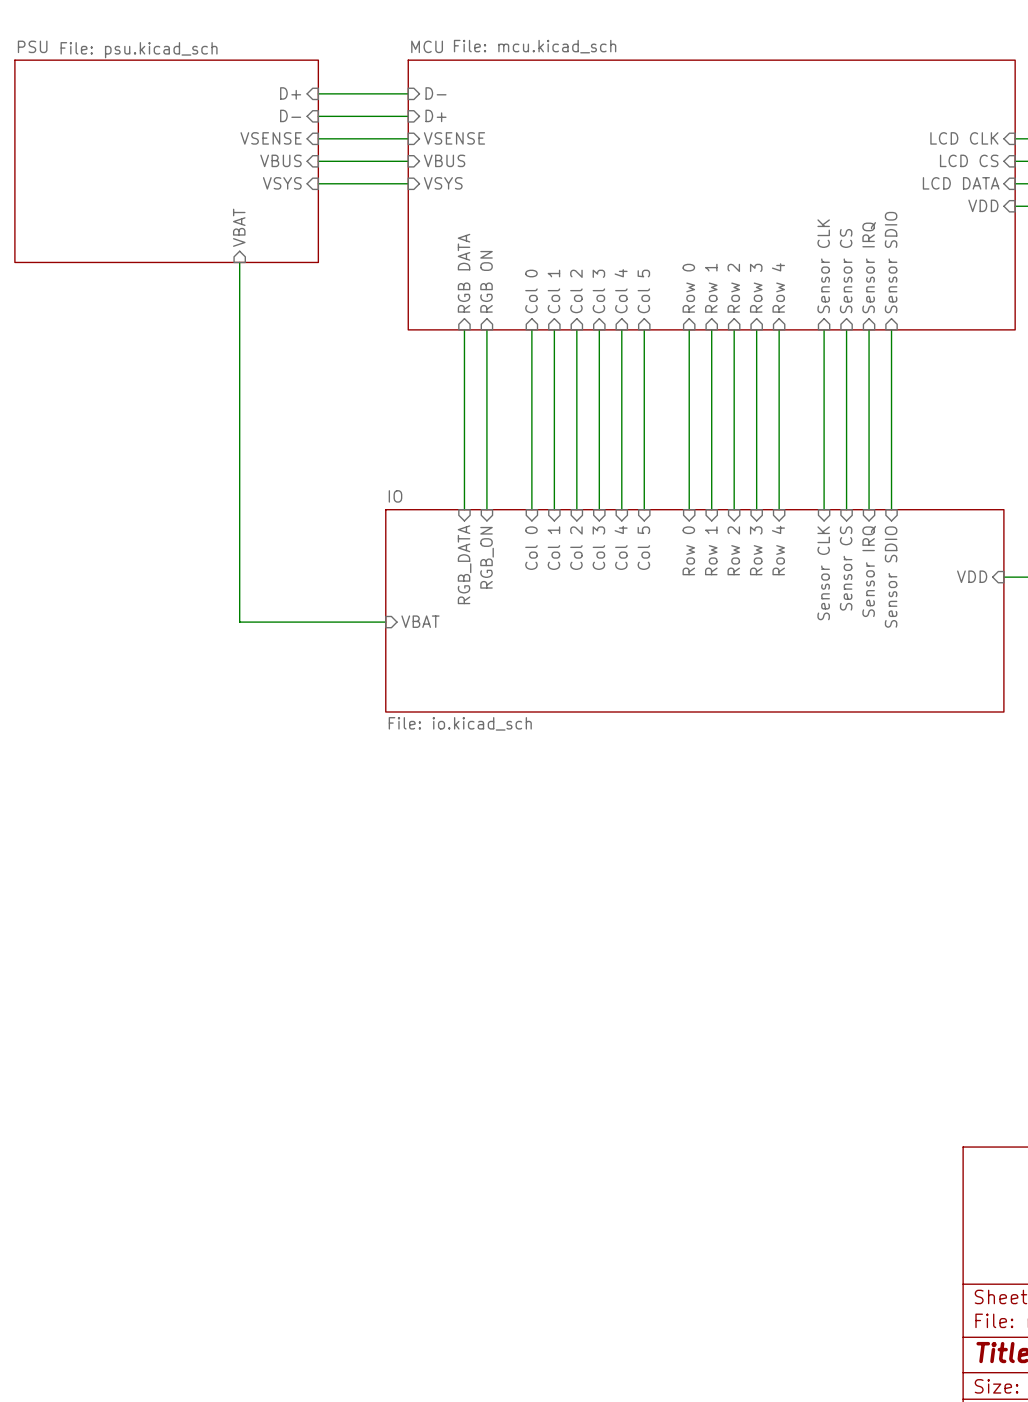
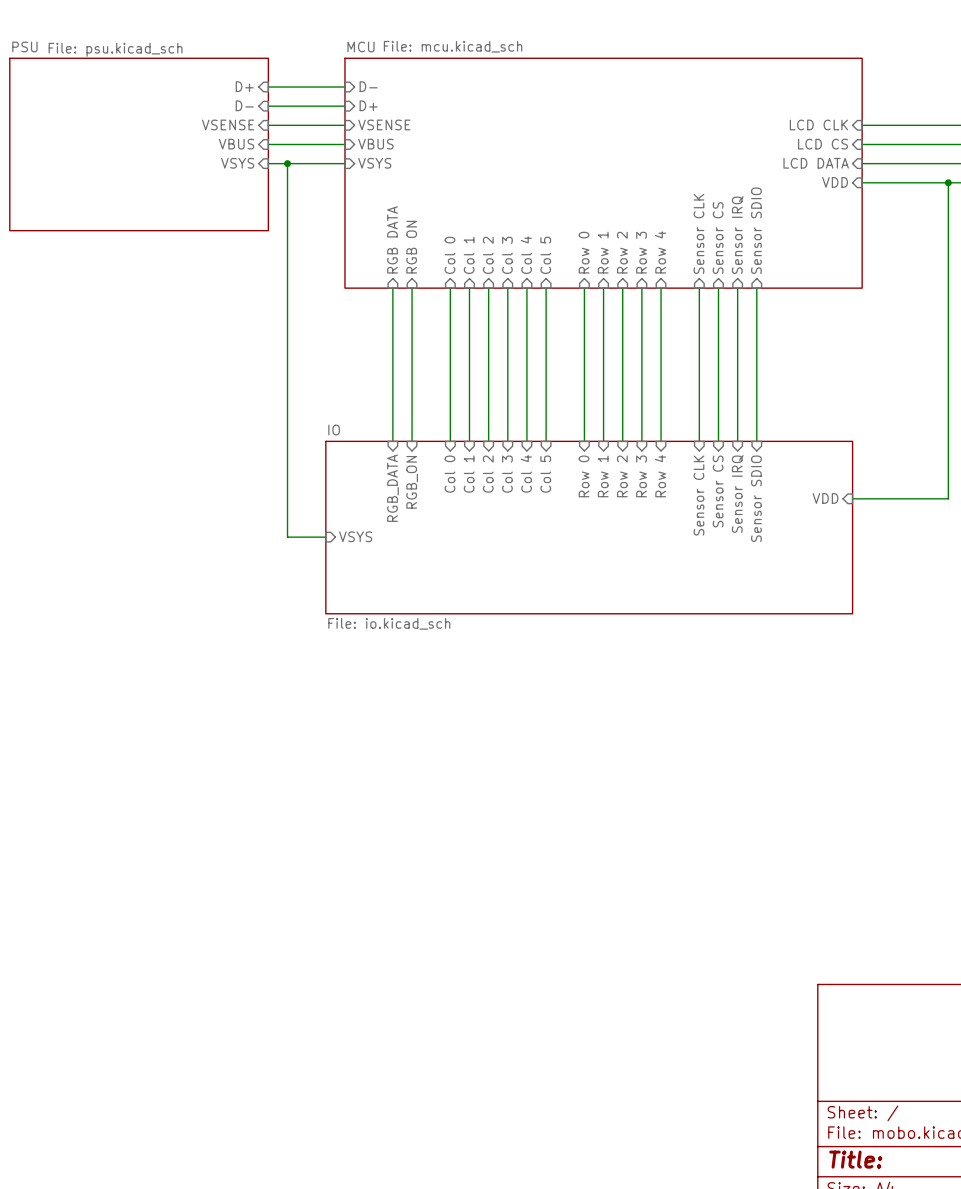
junction: none -> (287, 163)
sheet pin: VBAT (239, 227) -> none
wire: (239, 262) (239, 622) (340, 622) -> (287, 163) (287, 537)
sheet pin: VBAT (420, 621) -> VSYS (355, 536)

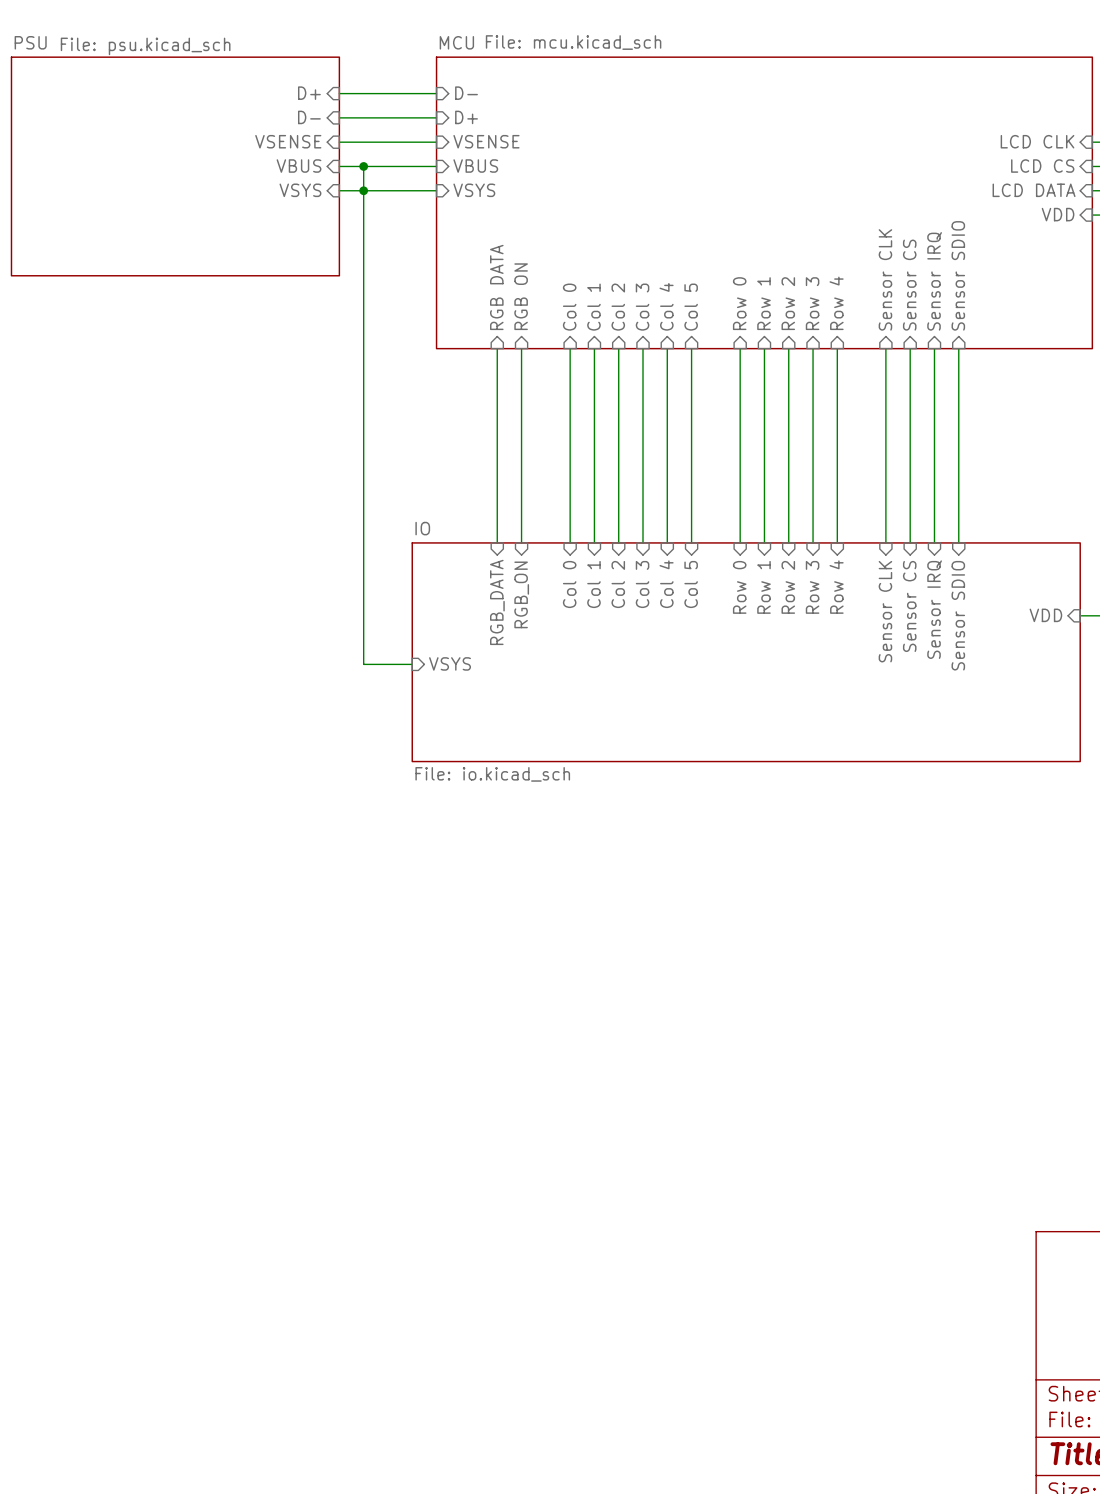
wire: none -> (363, 166) (363, 190)
junction: none -> (363, 166)

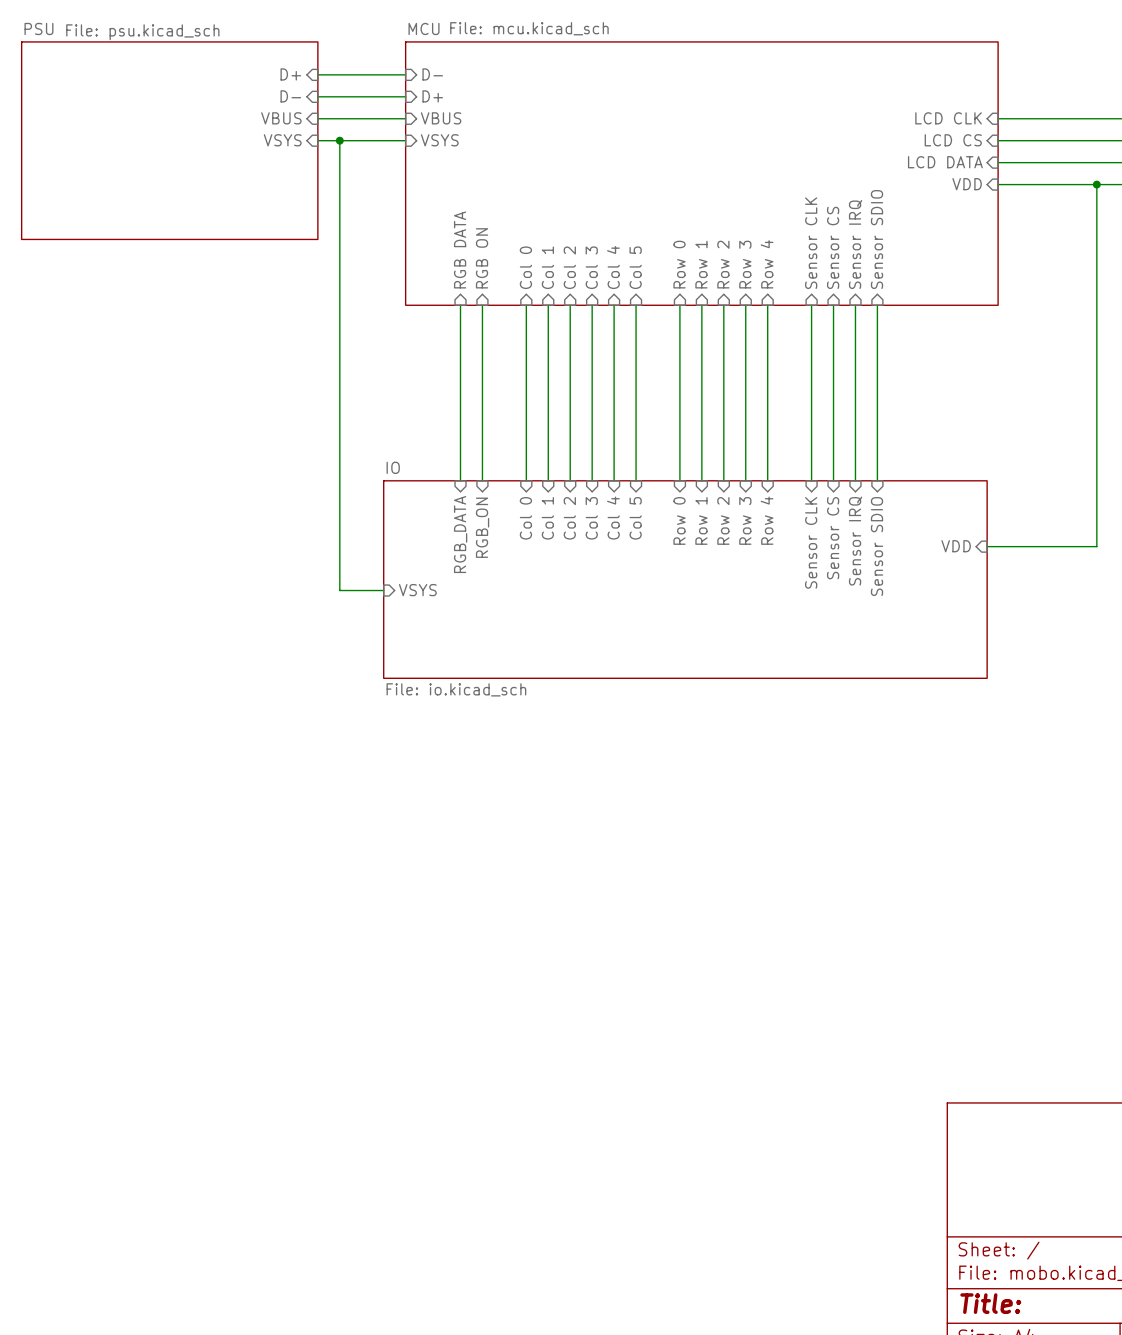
sheet pin: VSENSE (288, 141) -> VBUS (281, 118)
sheet pin: VSENSE (486, 141) -> VBUS (441, 118)
sheet pin: VBUS (299, 166) -> VSYS (282, 140)
sheet pin: VBUS (475, 166) -> VSYS (439, 140)
sheet pin: VSYS (300, 190) -> none
wire: (339, 190) (436, 190) -> none
junction: (363, 190) -> none
sheet pin: VSYS (474, 190) -> none

